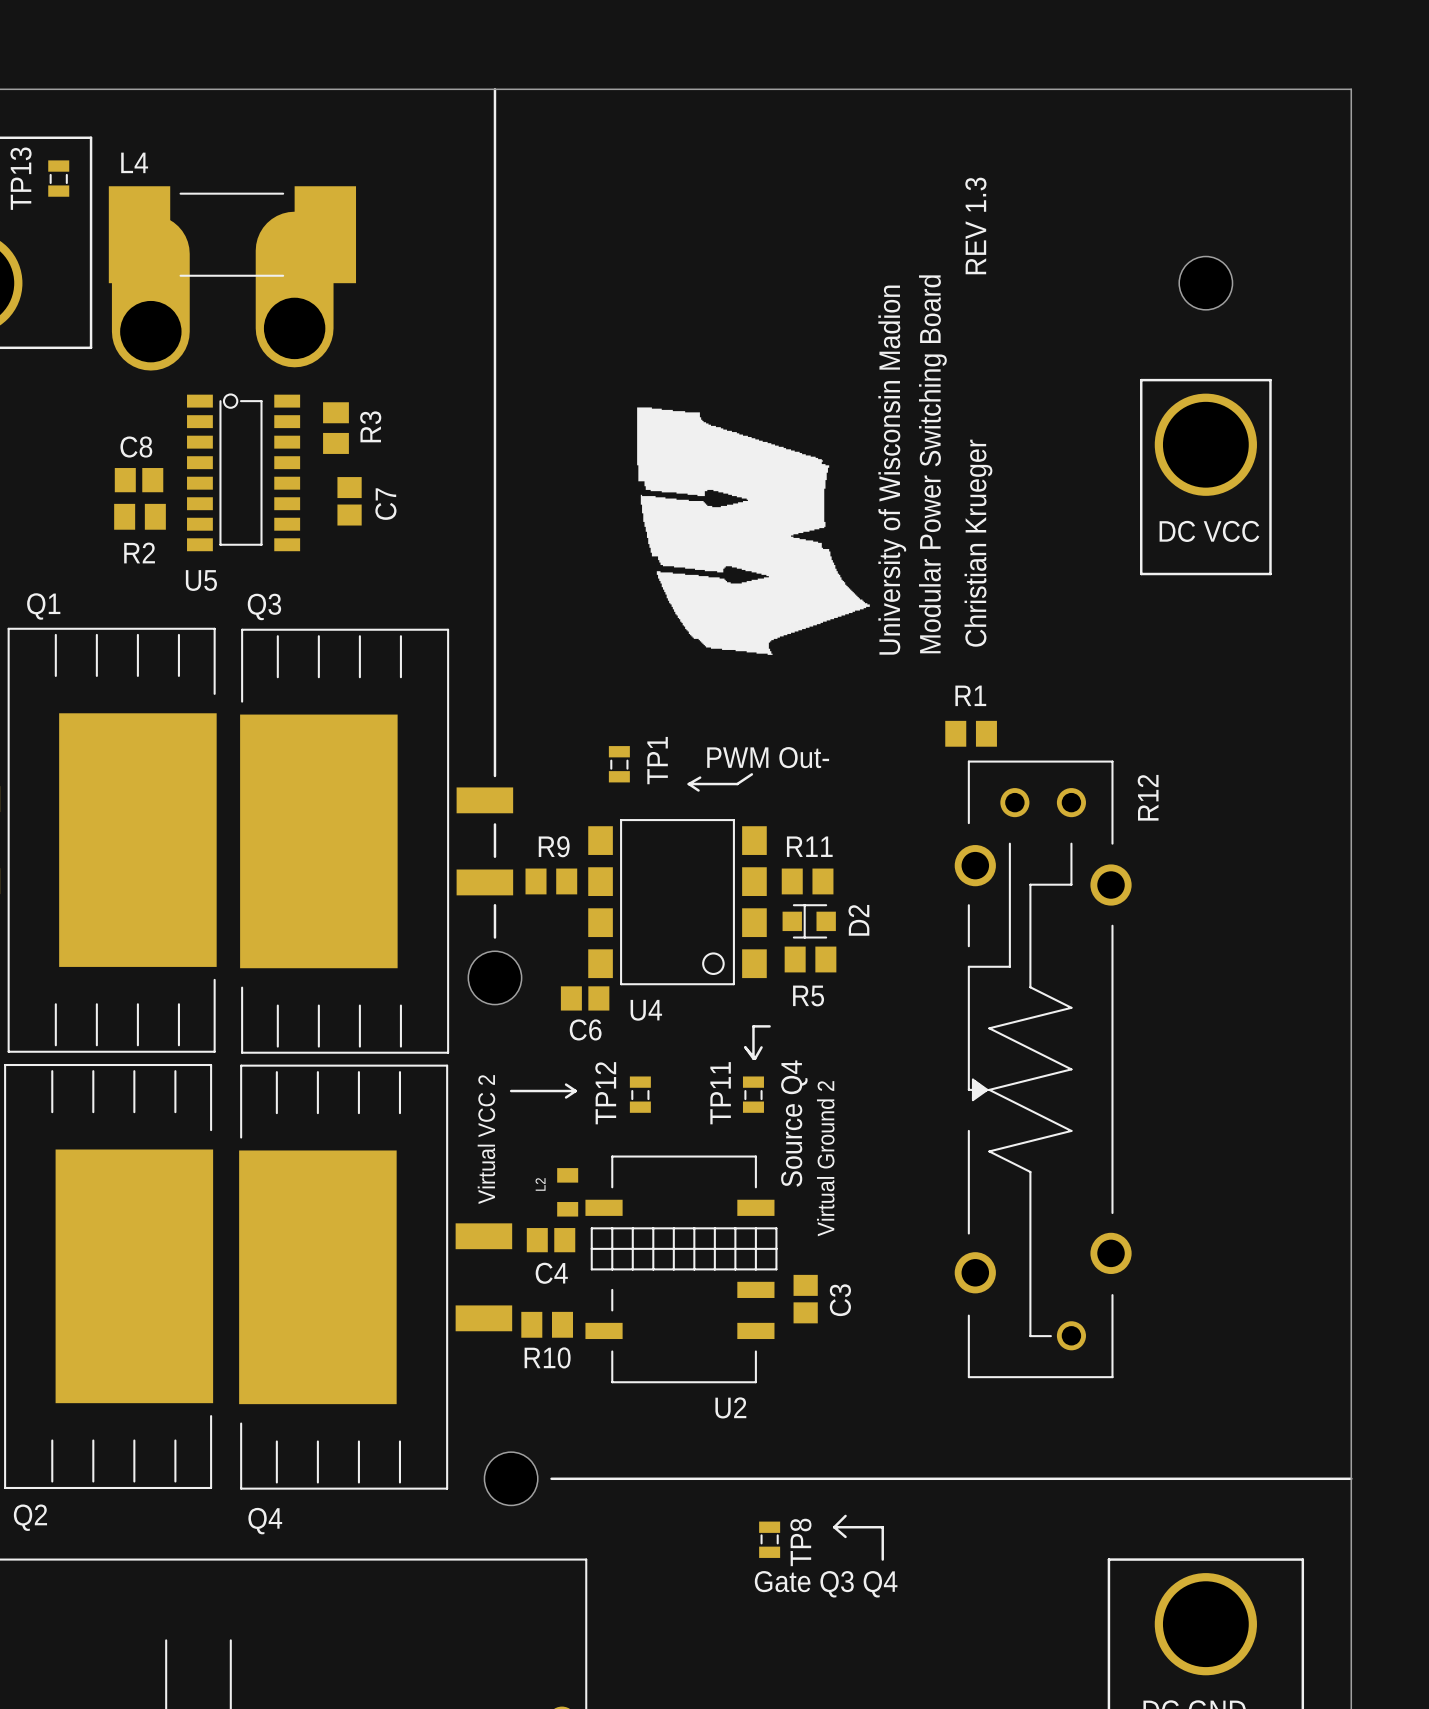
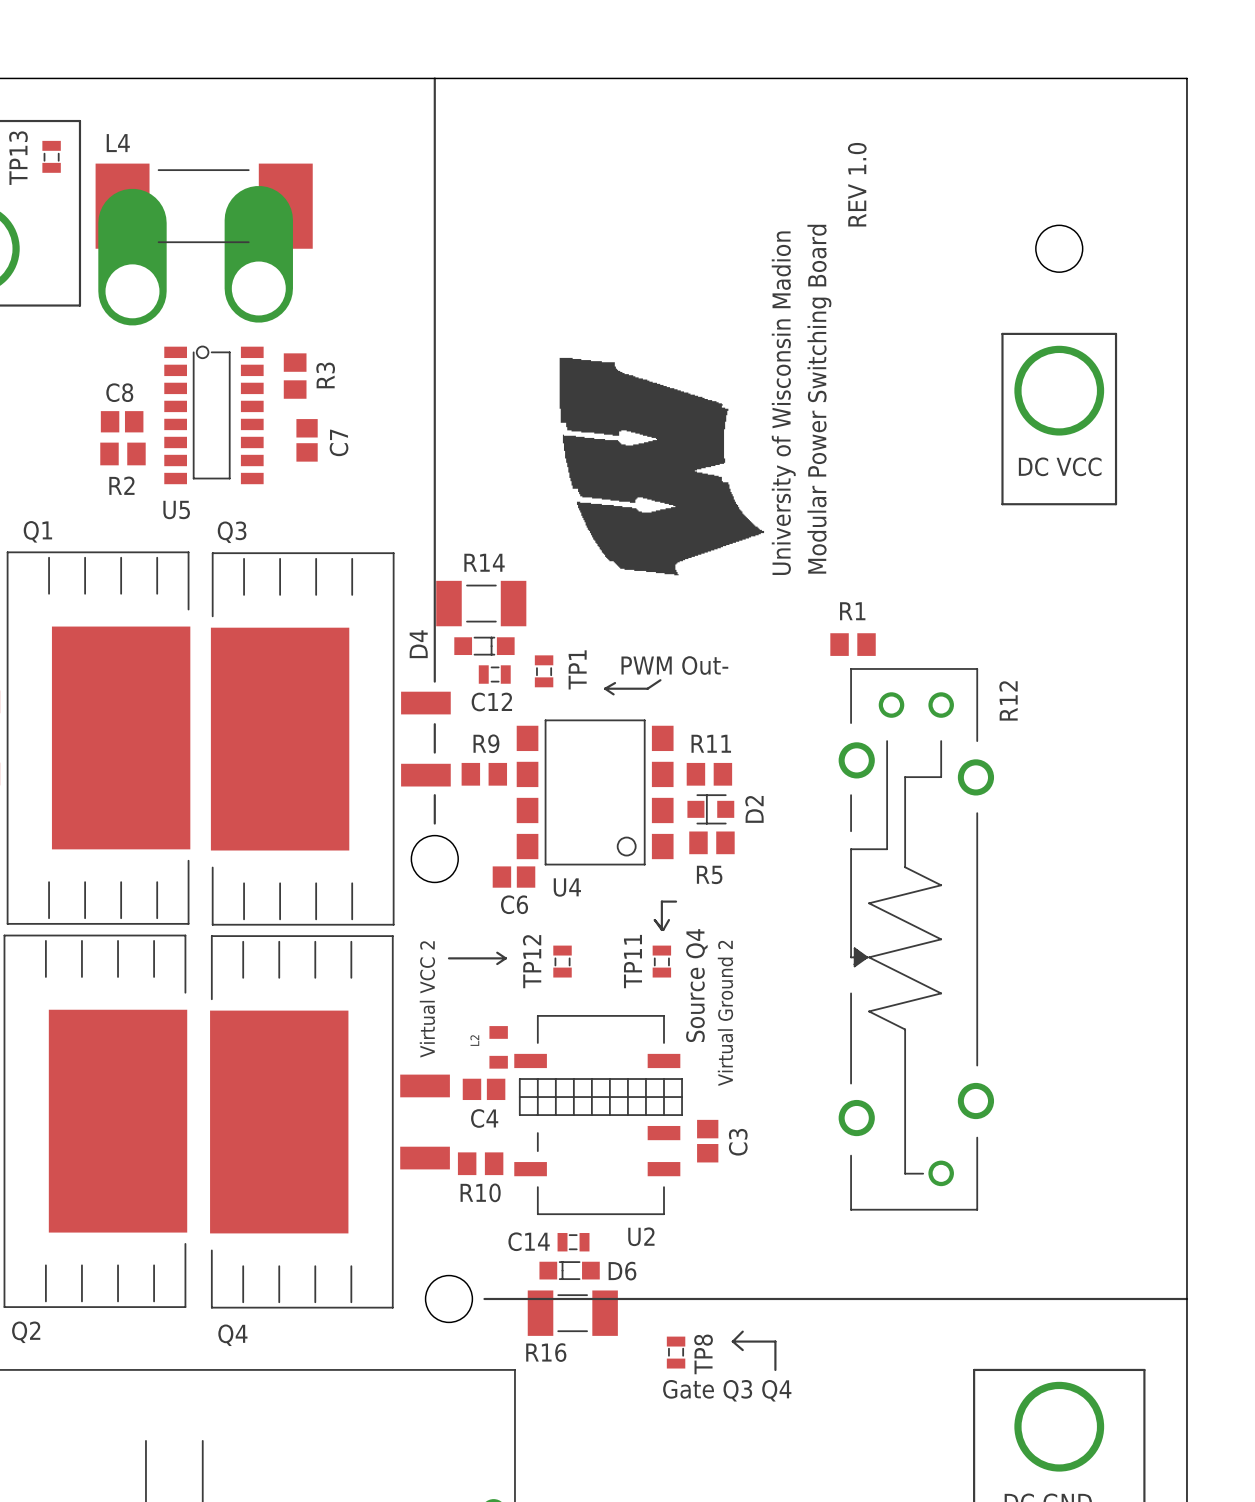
text: REV 1.3 (975, 225) -> REV 1.0 (857, 184)
text: Christian Krueger (978, 543) -> none
R14: none -> (481, 603)
D4: none -> (484, 646)
C12: none -> (494, 674)
C14: none -> (573, 1242)
D6: none -> (569, 1270)
R16: none -> (572, 1313)

